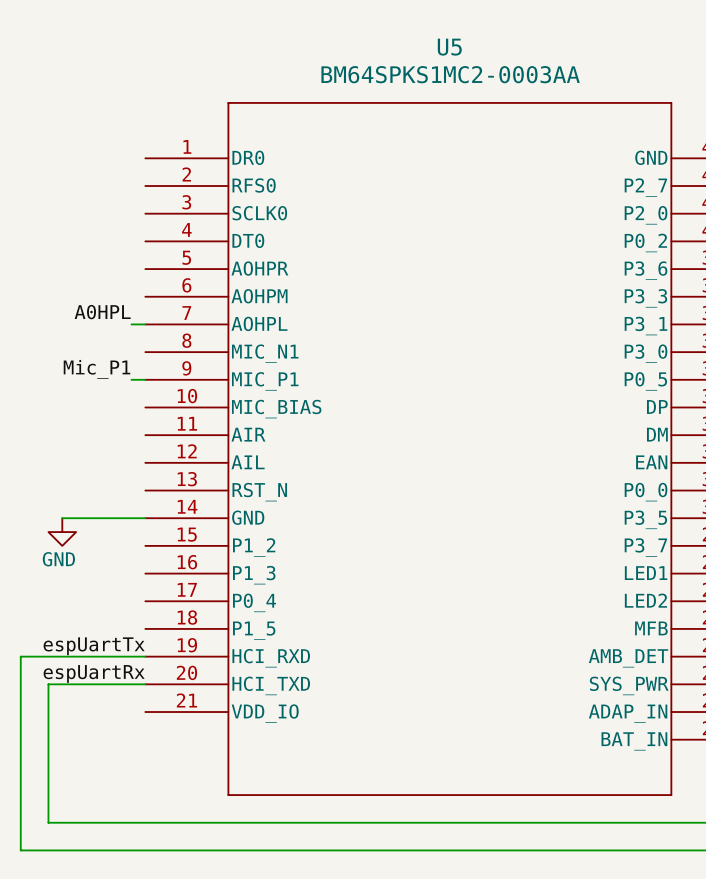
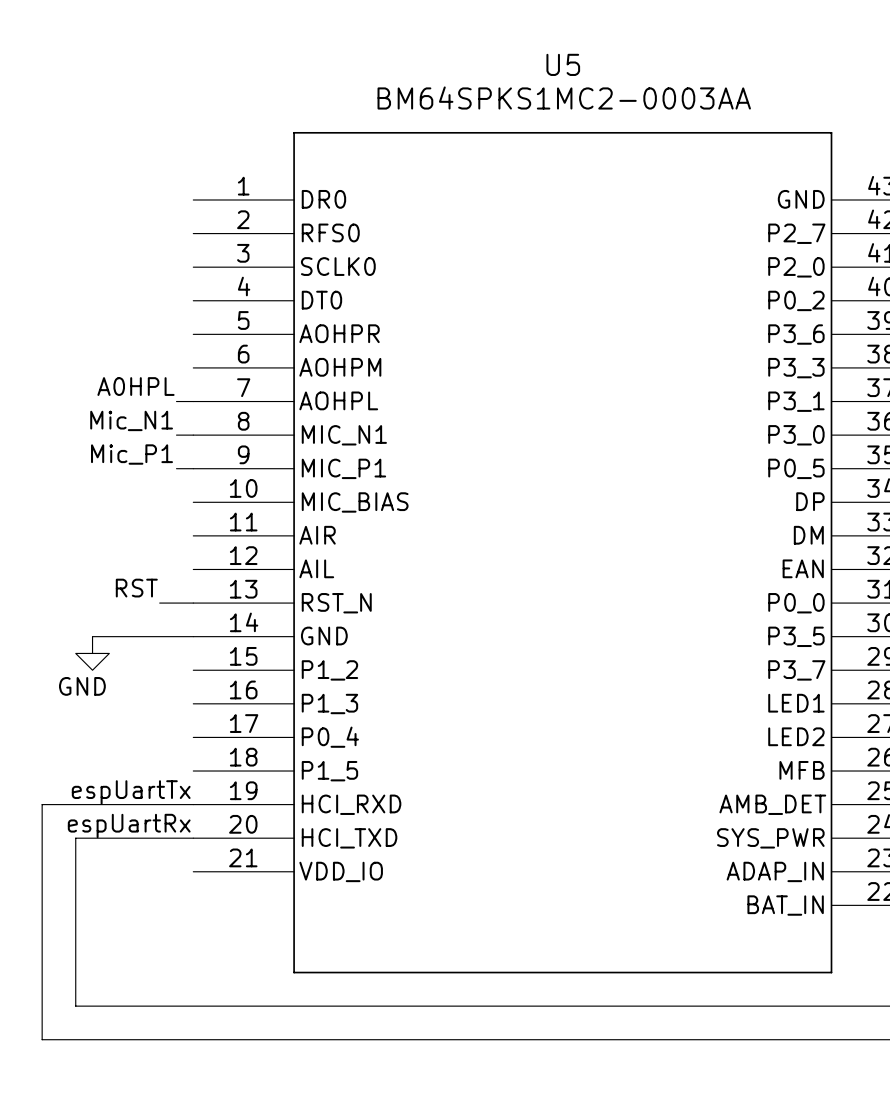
label: none -> Mic_N1 (131, 420)
wire: none -> (176, 435) (193, 435)
label: none -> RST (136, 588)
wire: none -> (159, 603) (193, 603)

